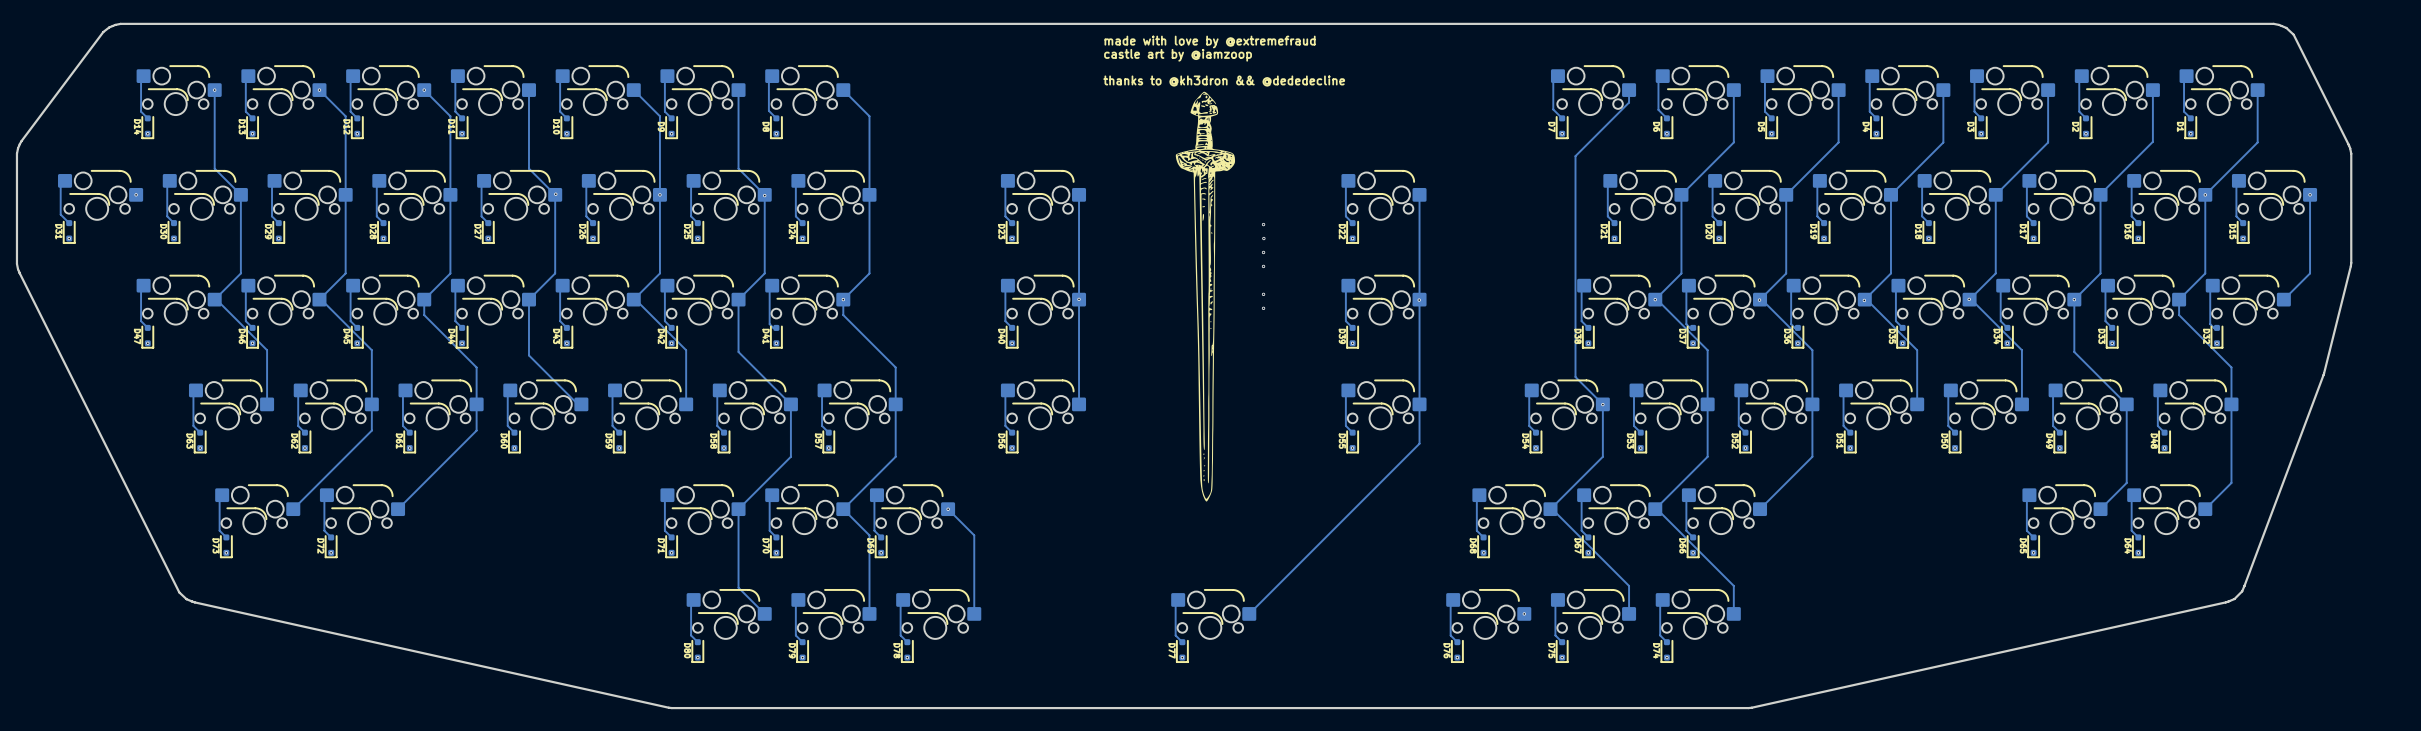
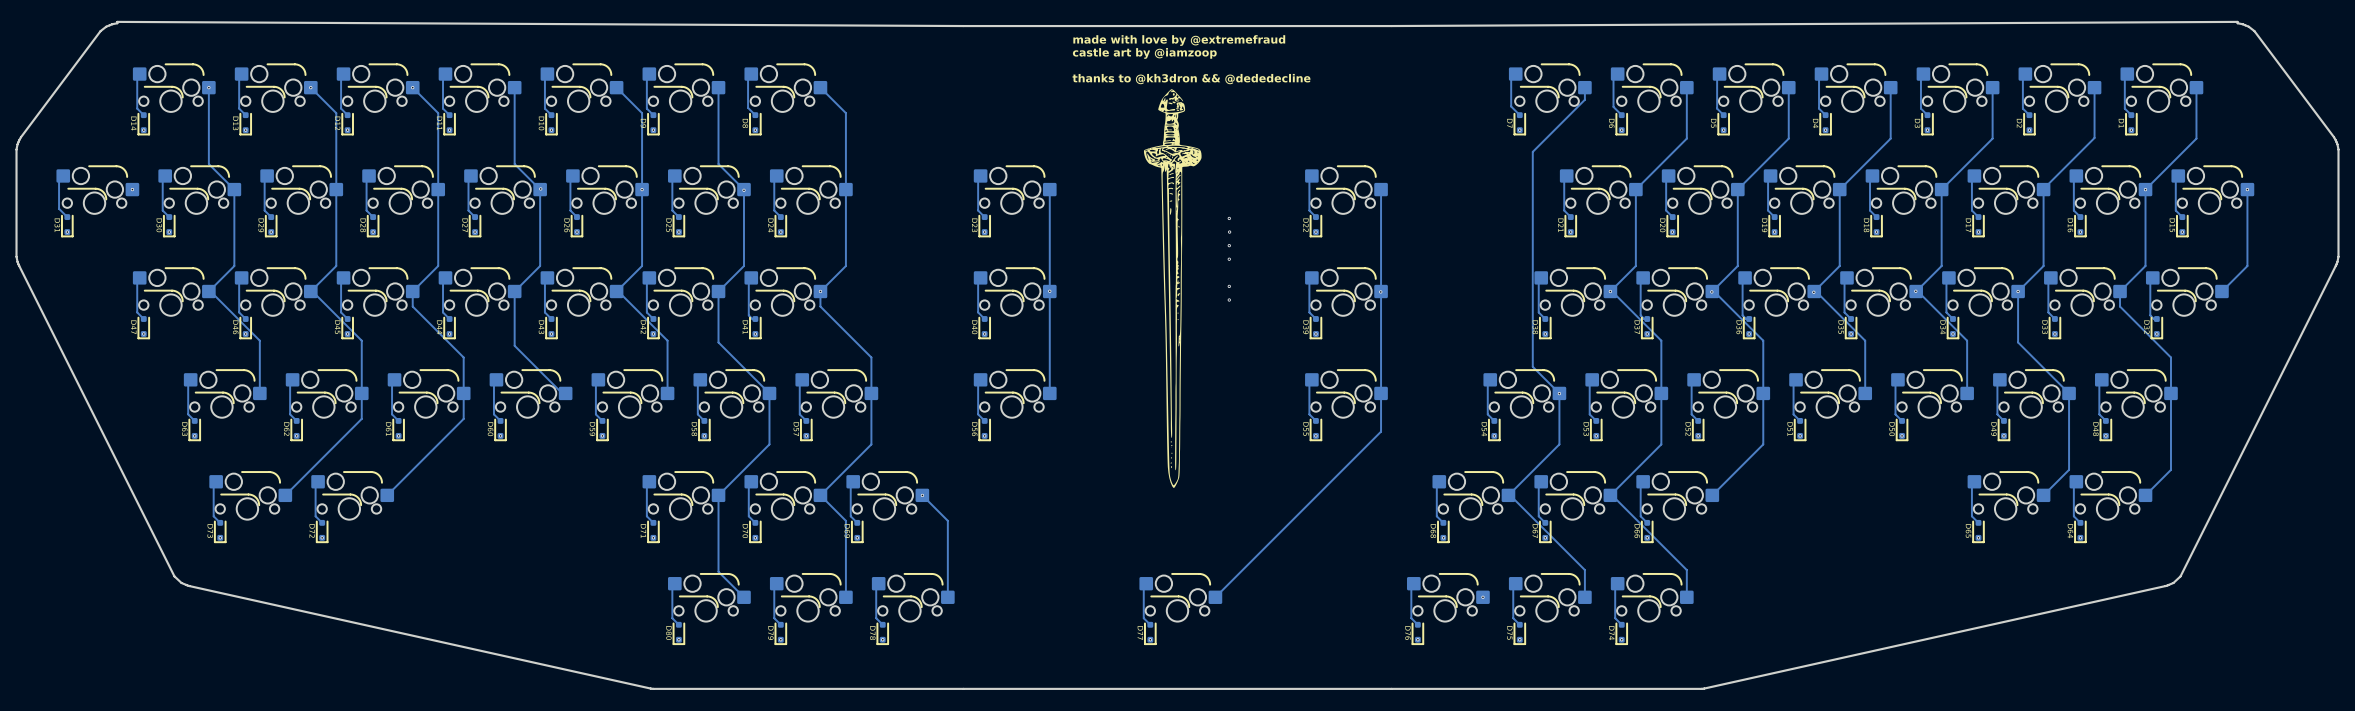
board edge: (120, 23) (2279, 24) (2286, 27) (2293, 34) (2350, 148) (2351, 262) (2323, 374) (2244, 585) (2242, 591) (2234, 599) -> (117, 23) (1391, 26) (2237, 21) (2254, 31) (2335, 140) (2338, 149) (2338, 256) (2335, 265) (2180, 576) (2173, 582)

